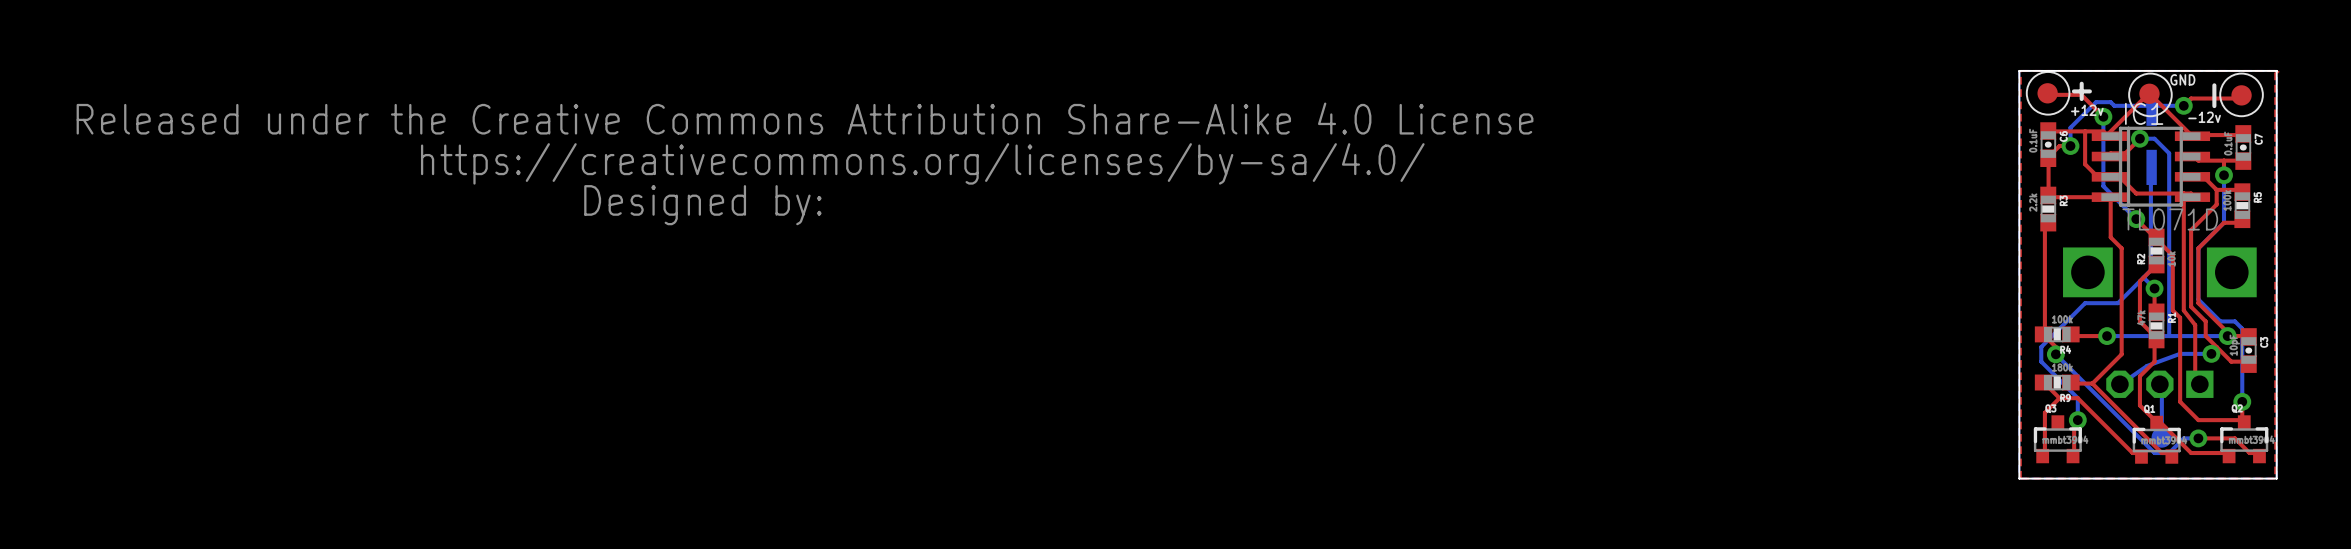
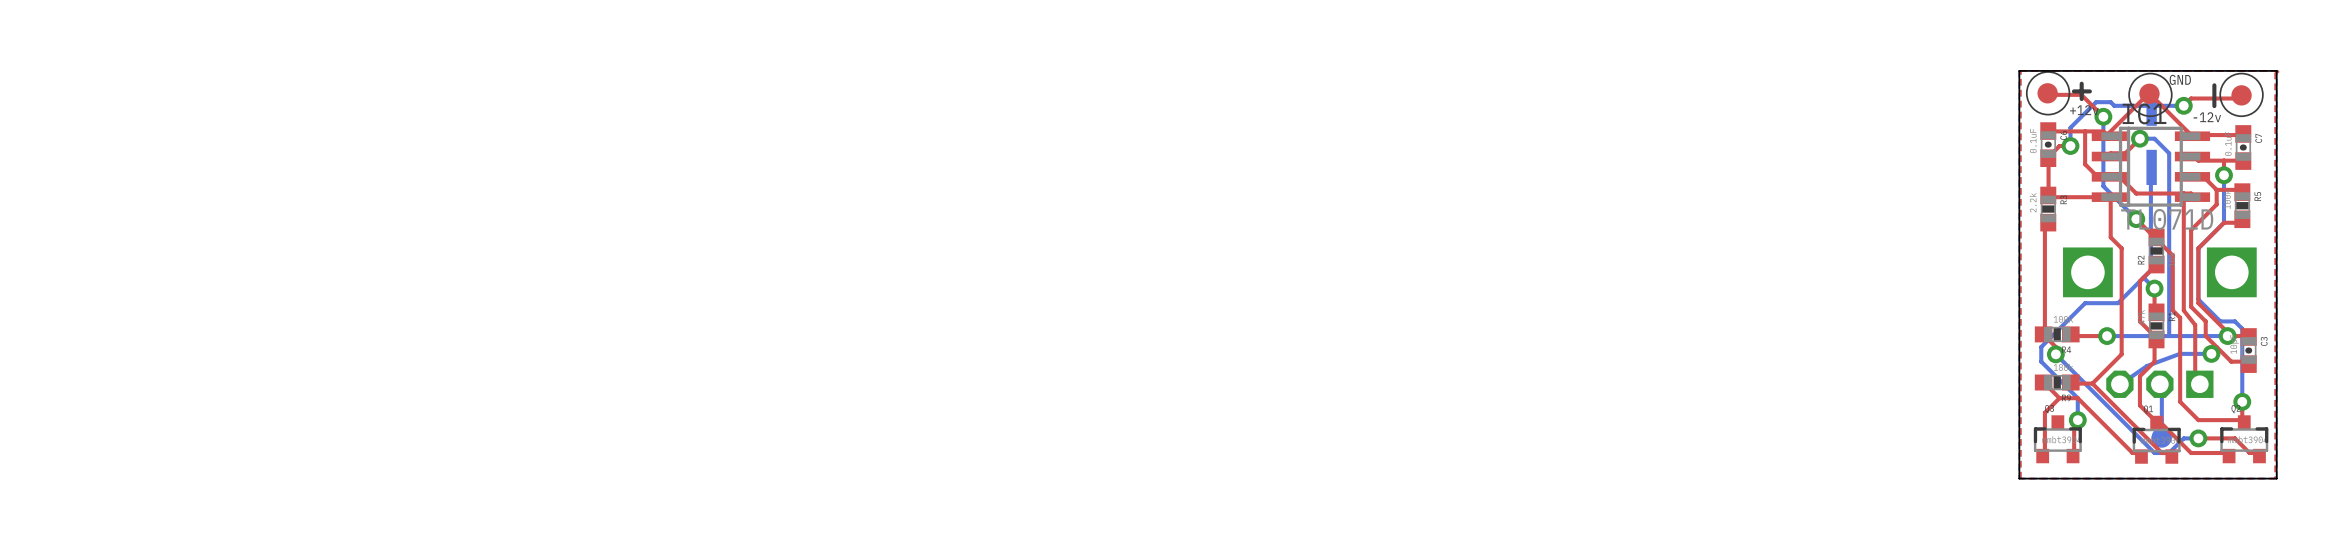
drawing: [76, 102, 1534, 226] -> none

